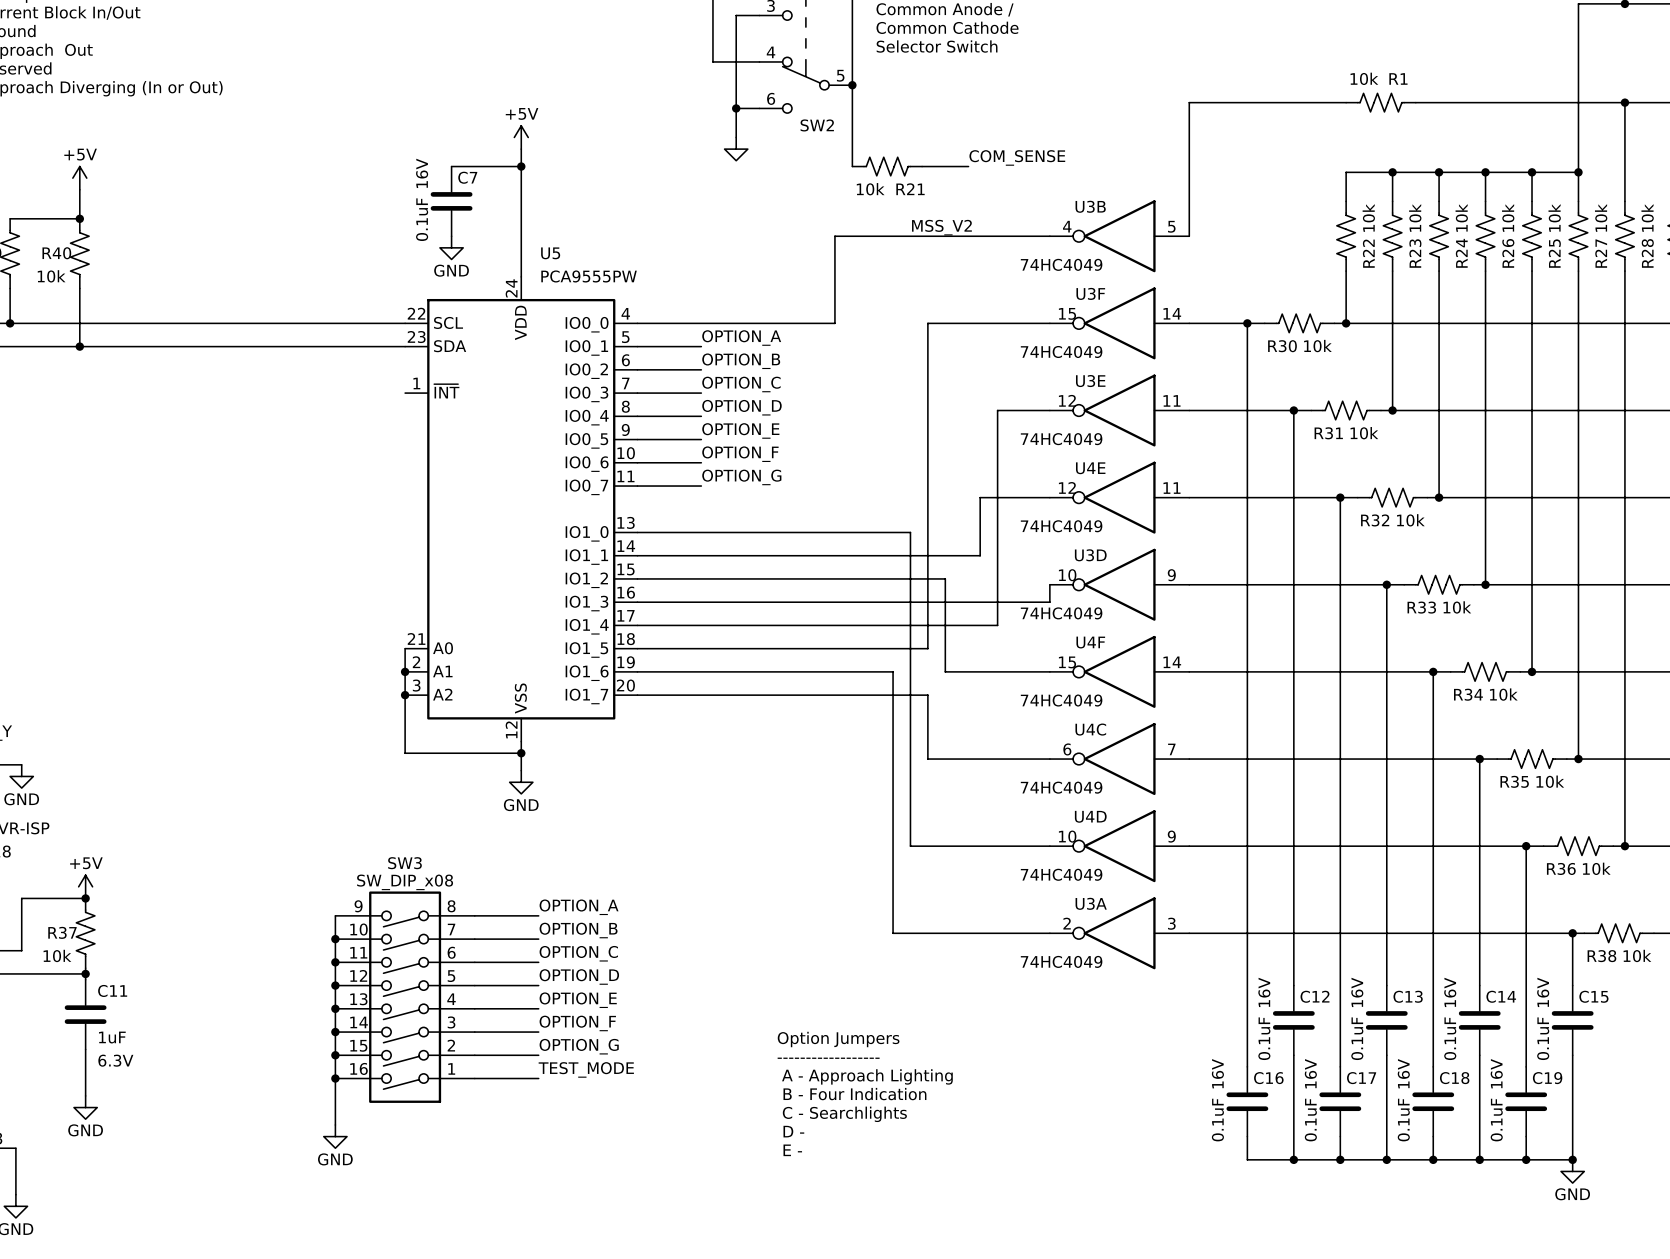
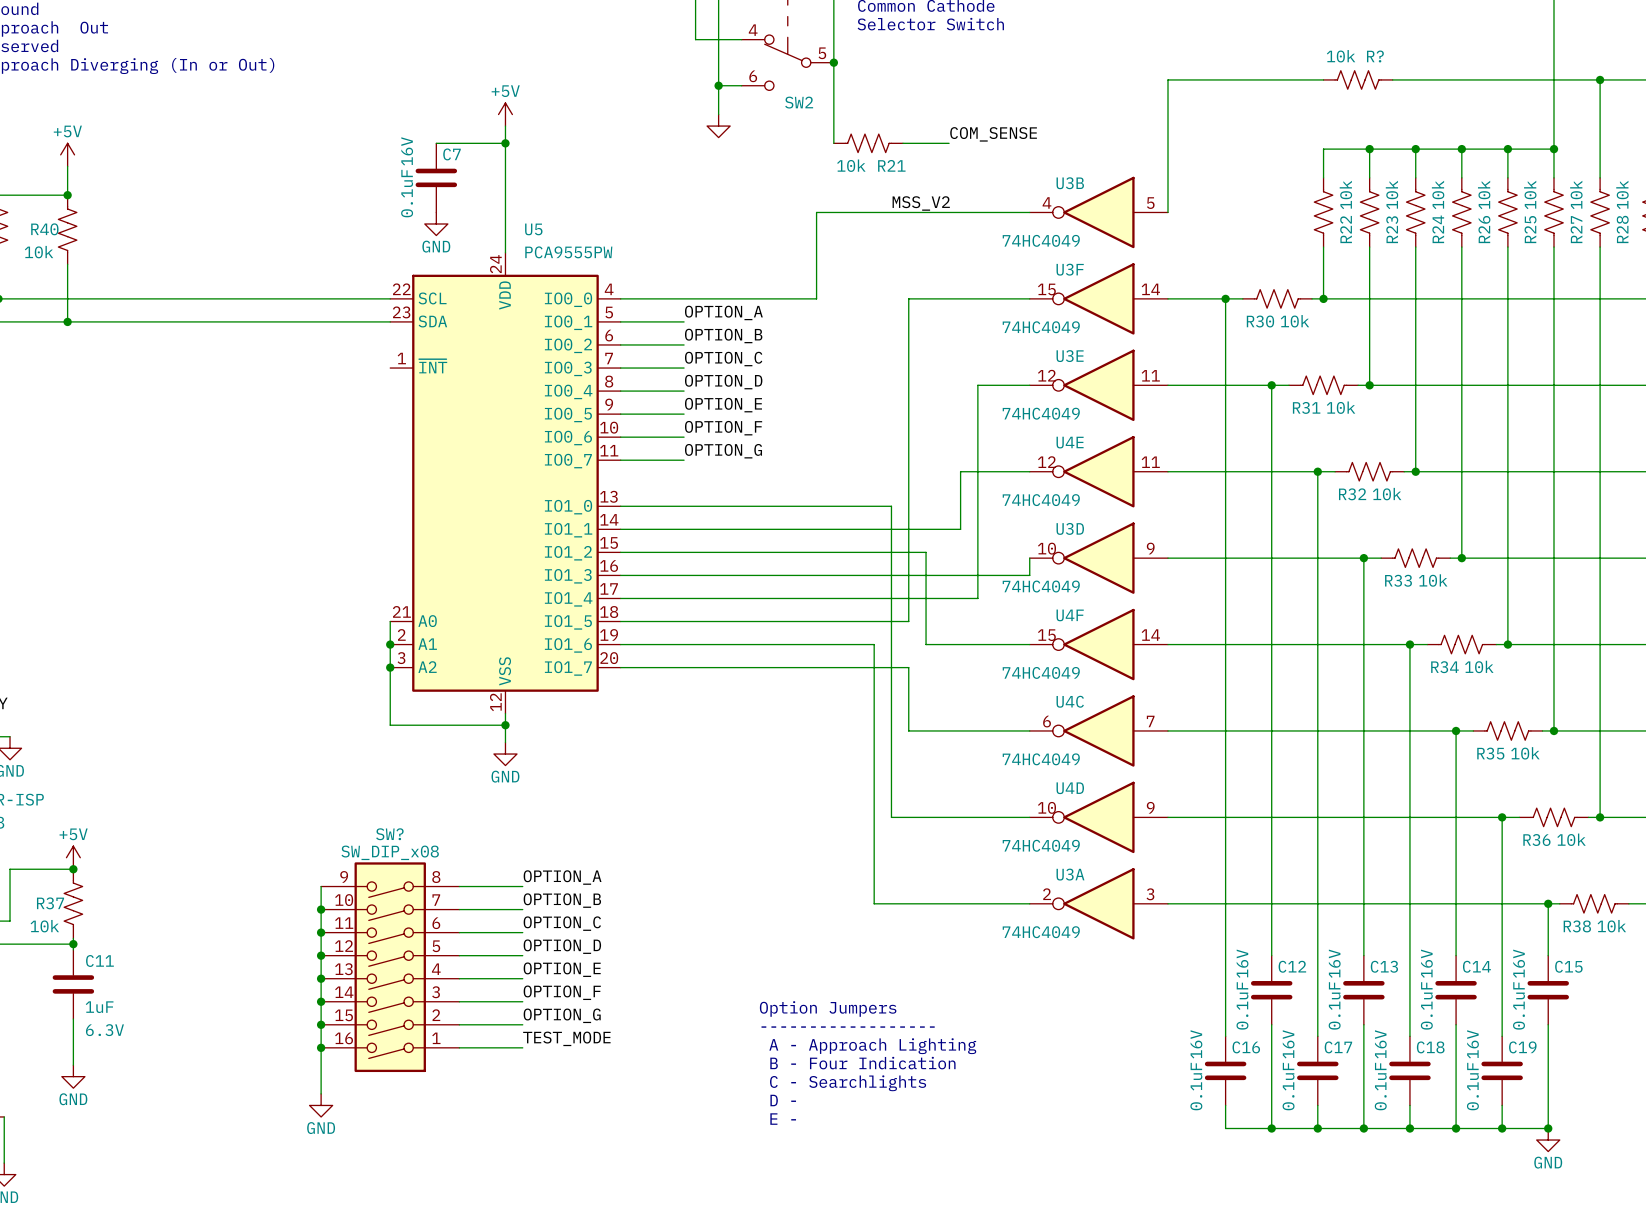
R1 name: R1 (1398, 78) -> R? (1375, 56)
SW3 name: SW3 (404, 863) -> SW? (389, 834)

